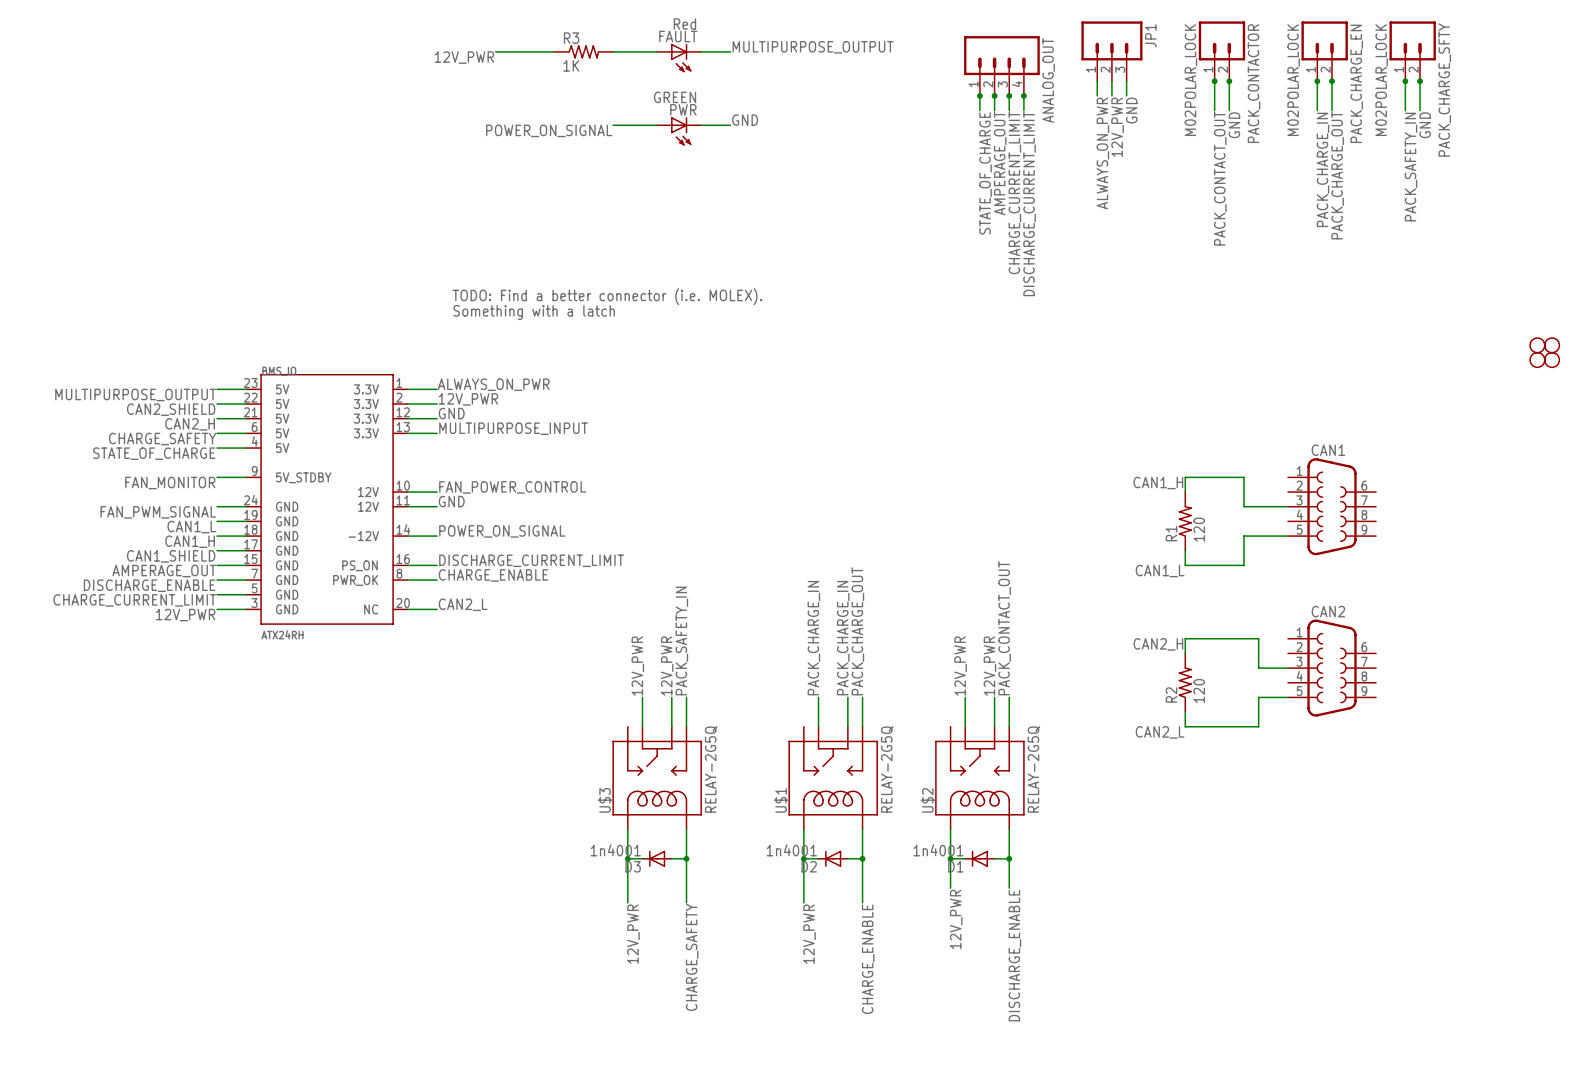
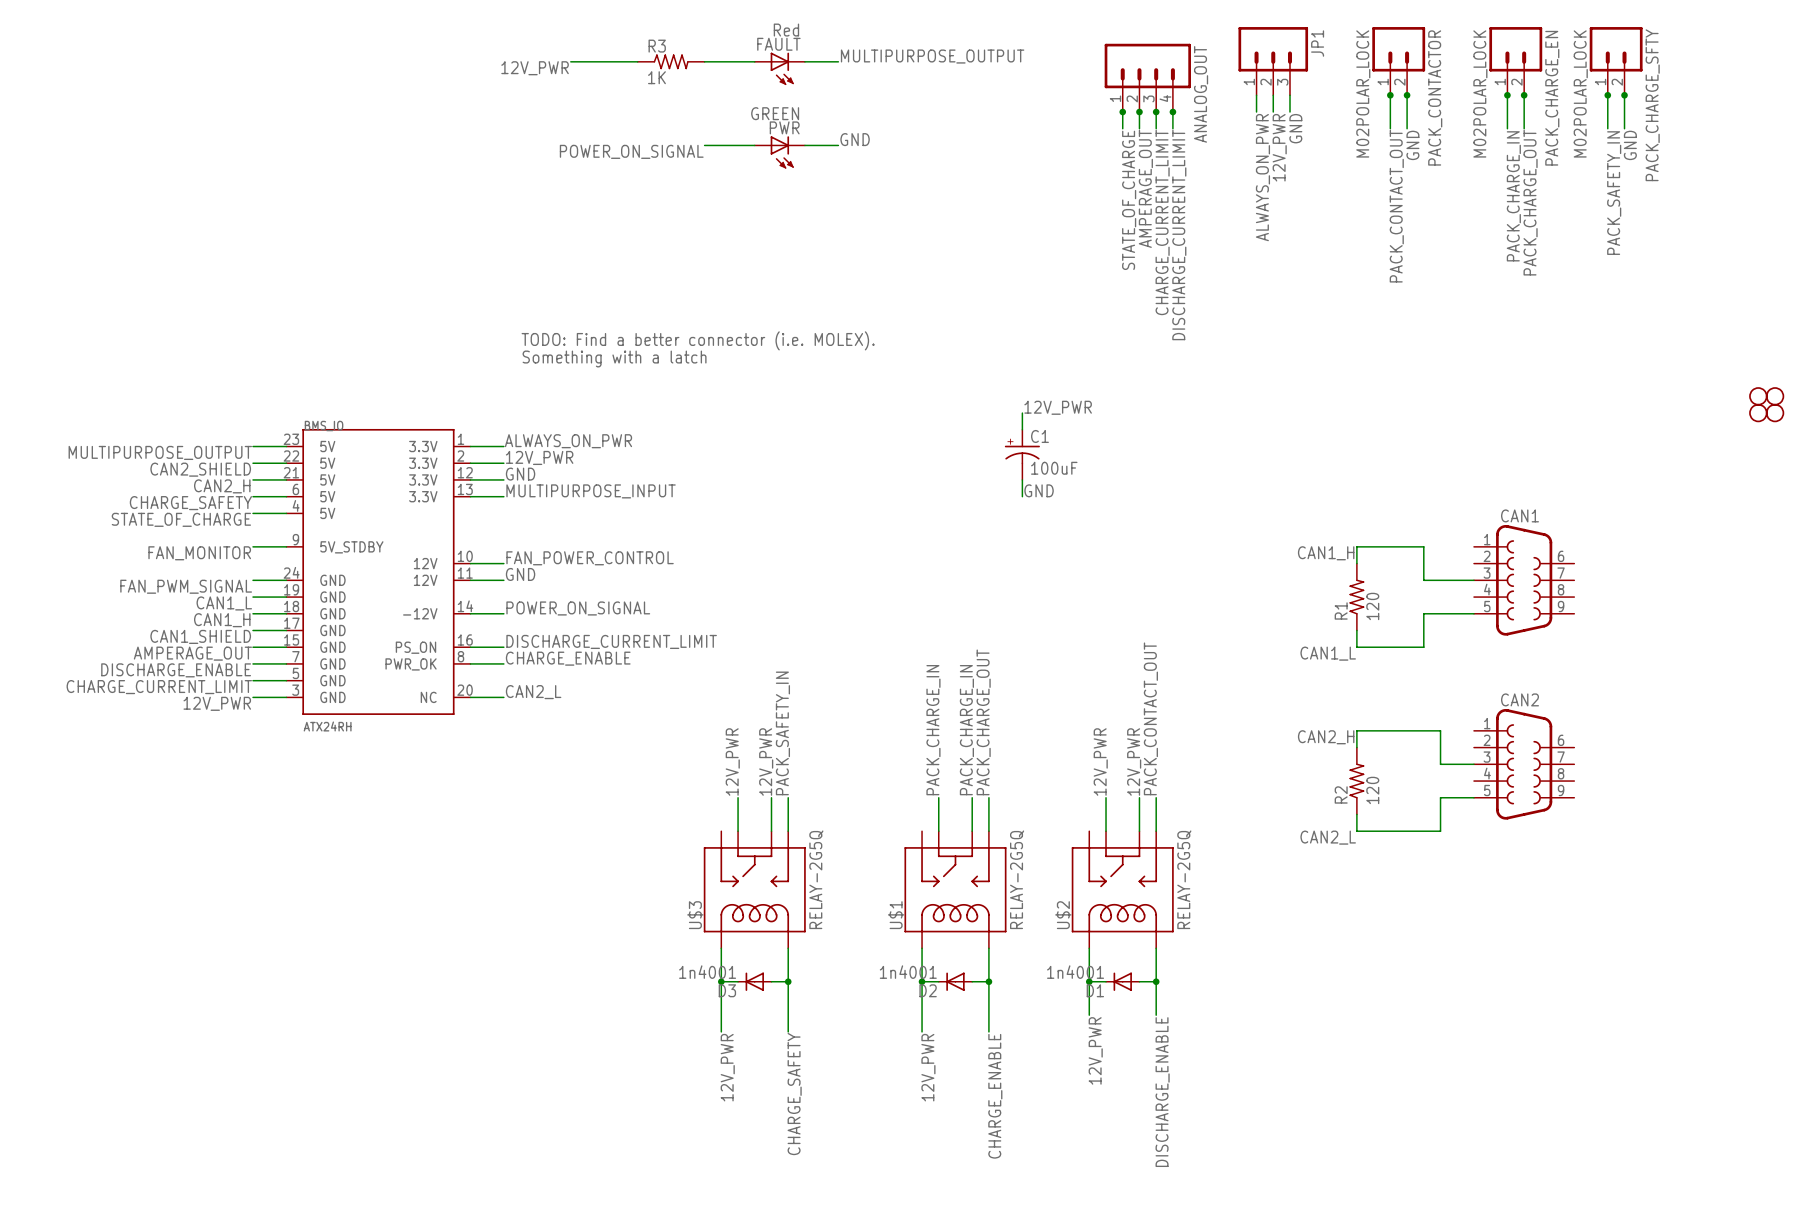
label: none -> 12V_PWR (1058, 407)
wire: none -> (1022, 413) (1022, 429)
C1: none -> 100uF (1022, 454)
wire: none -> (1022, 479) (1022, 496)
label: none -> GND (1039, 490)

